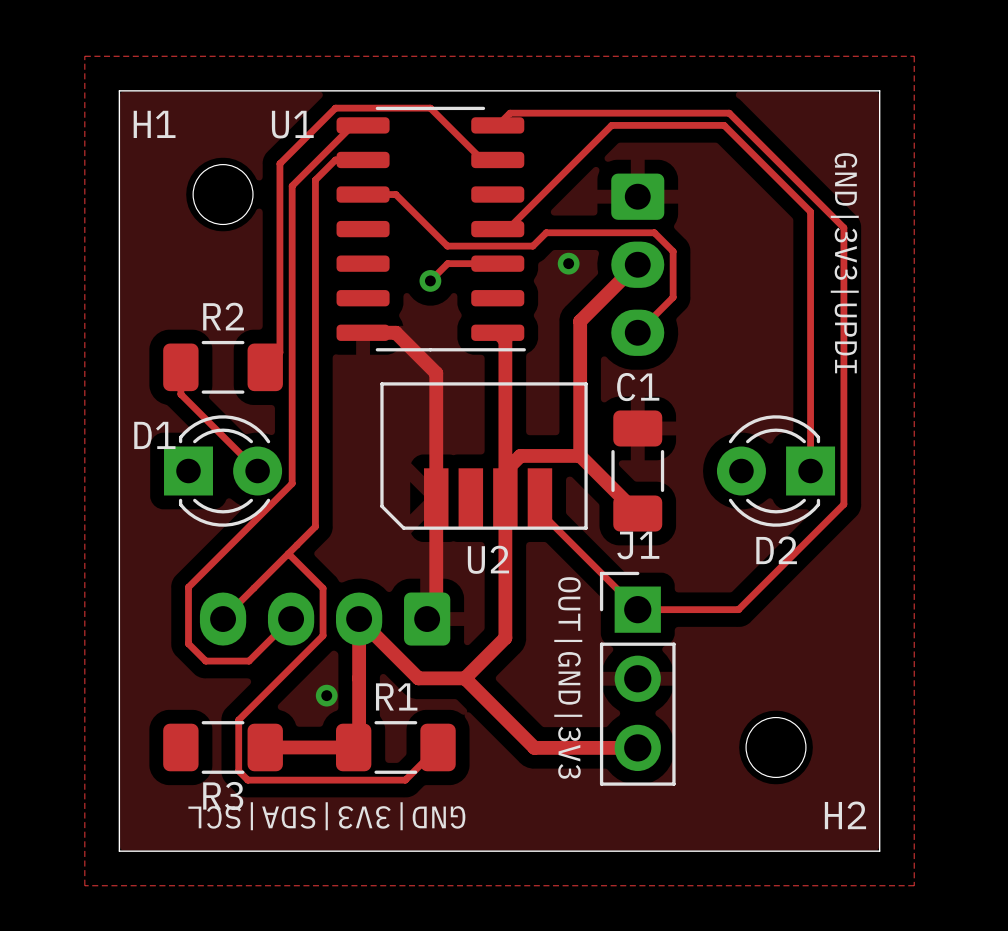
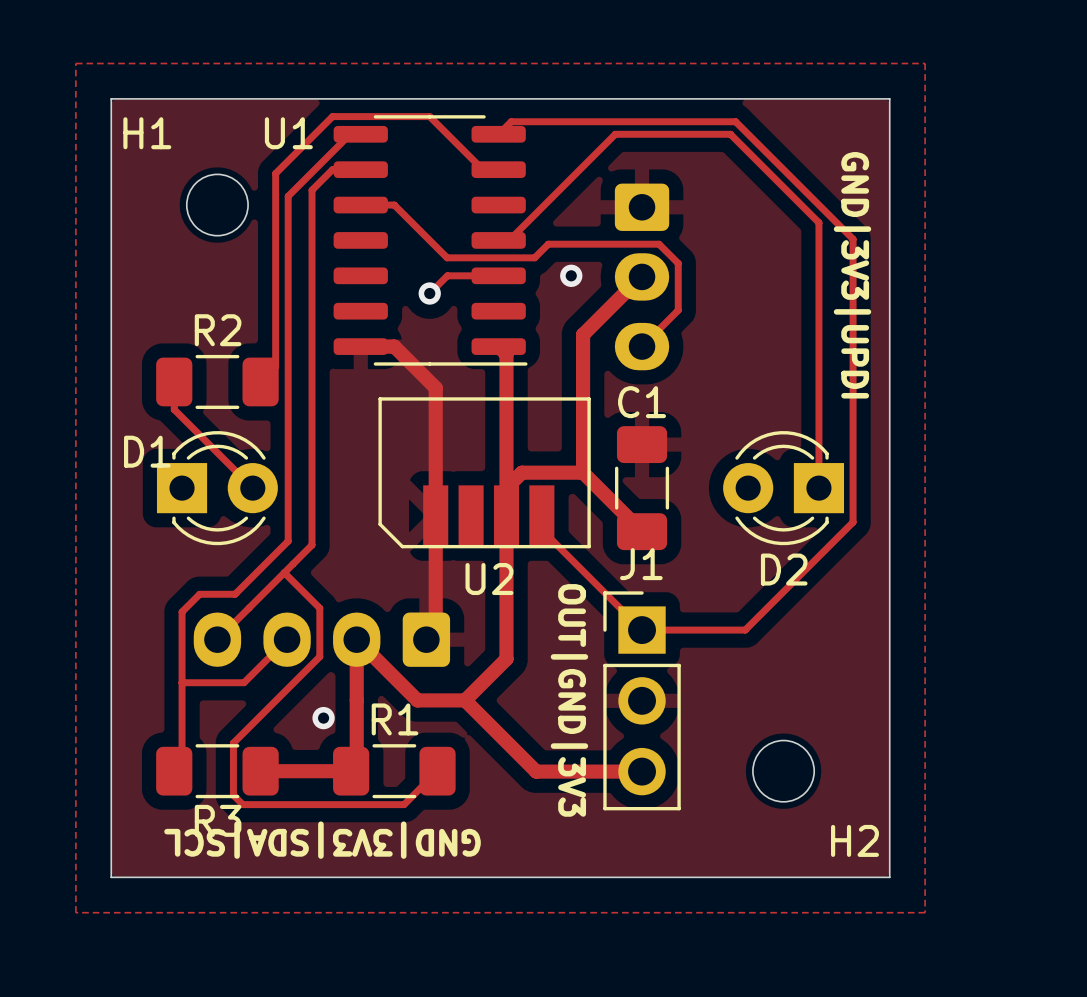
track: (292, 483) (188, 587) (188, 591) -> (288, 501) (288, 541) (235, 594) (199, 594) (182, 611)
track: (188, 643) (205, 661) -> (182, 682) (199, 682)
track: none -> (182, 665) (182, 763) (174, 771)

